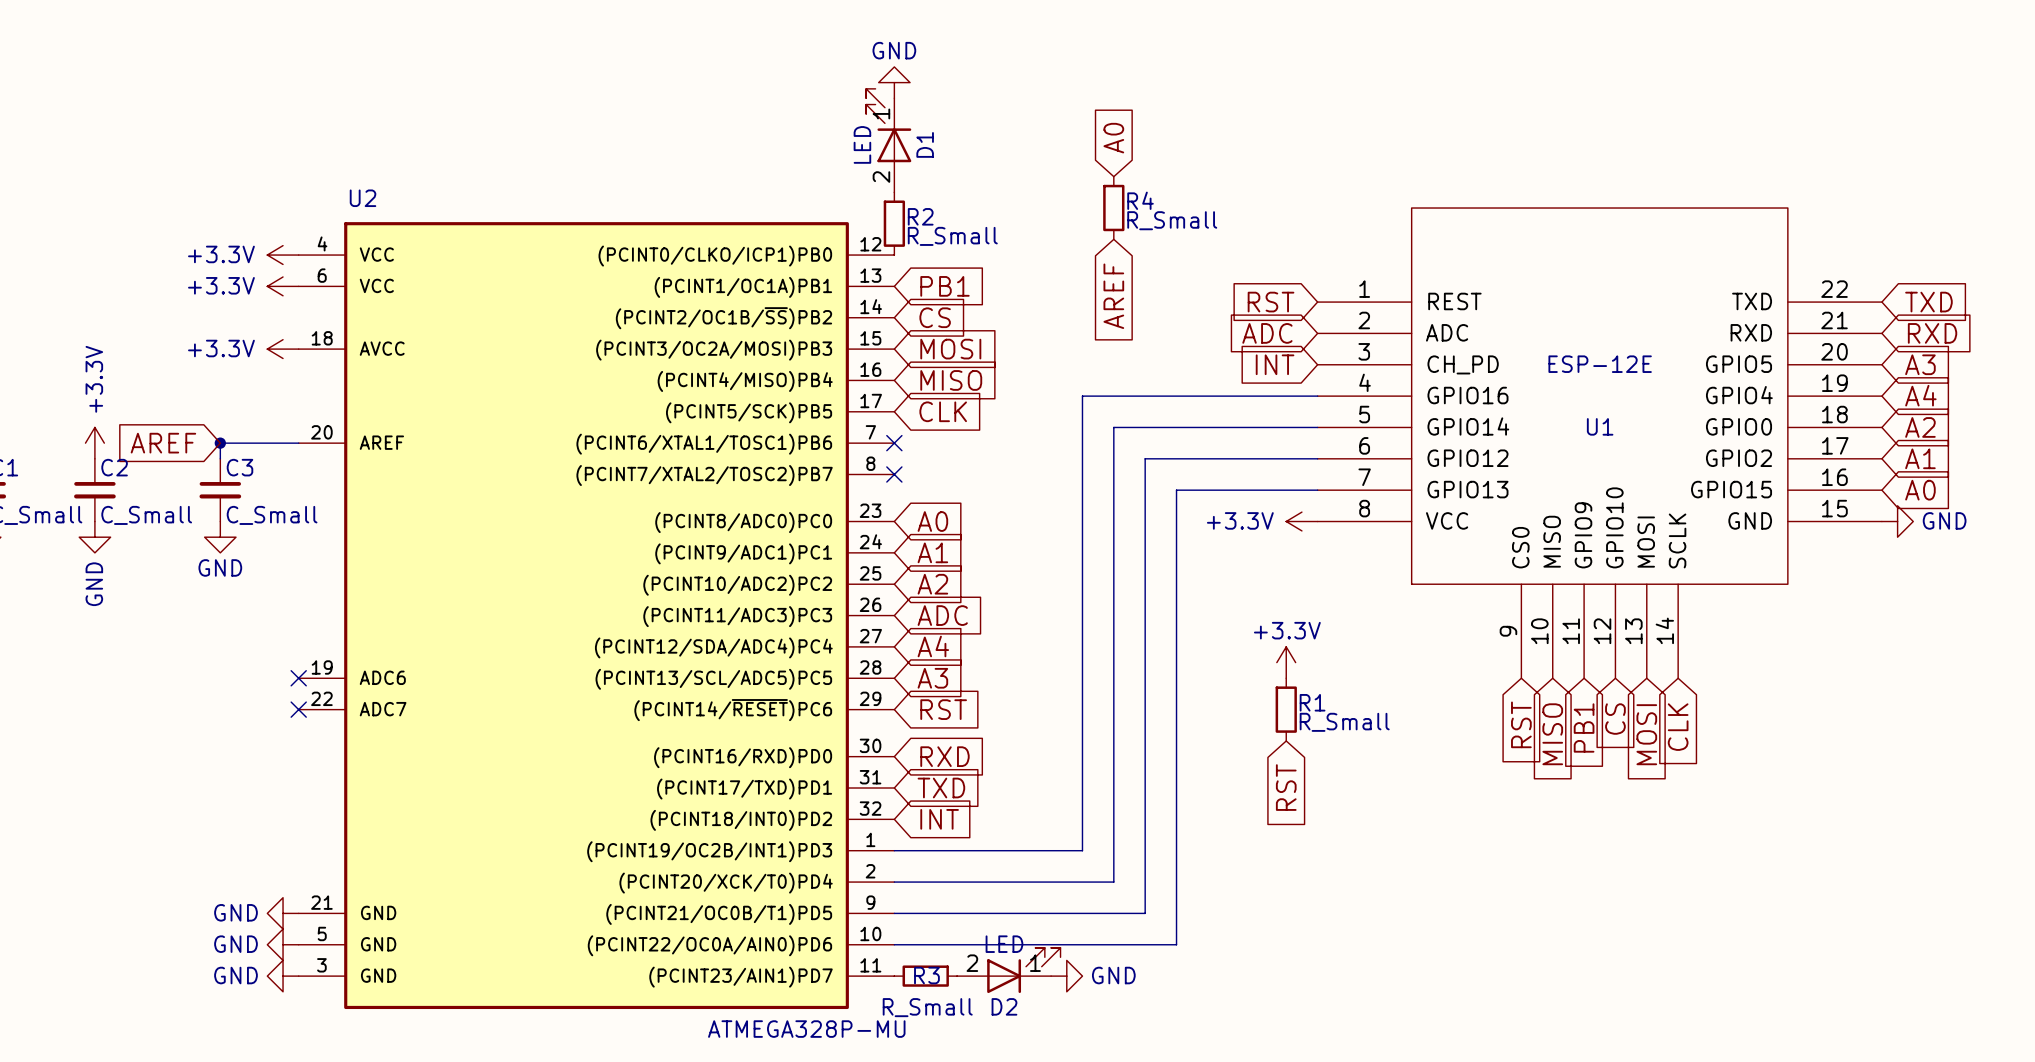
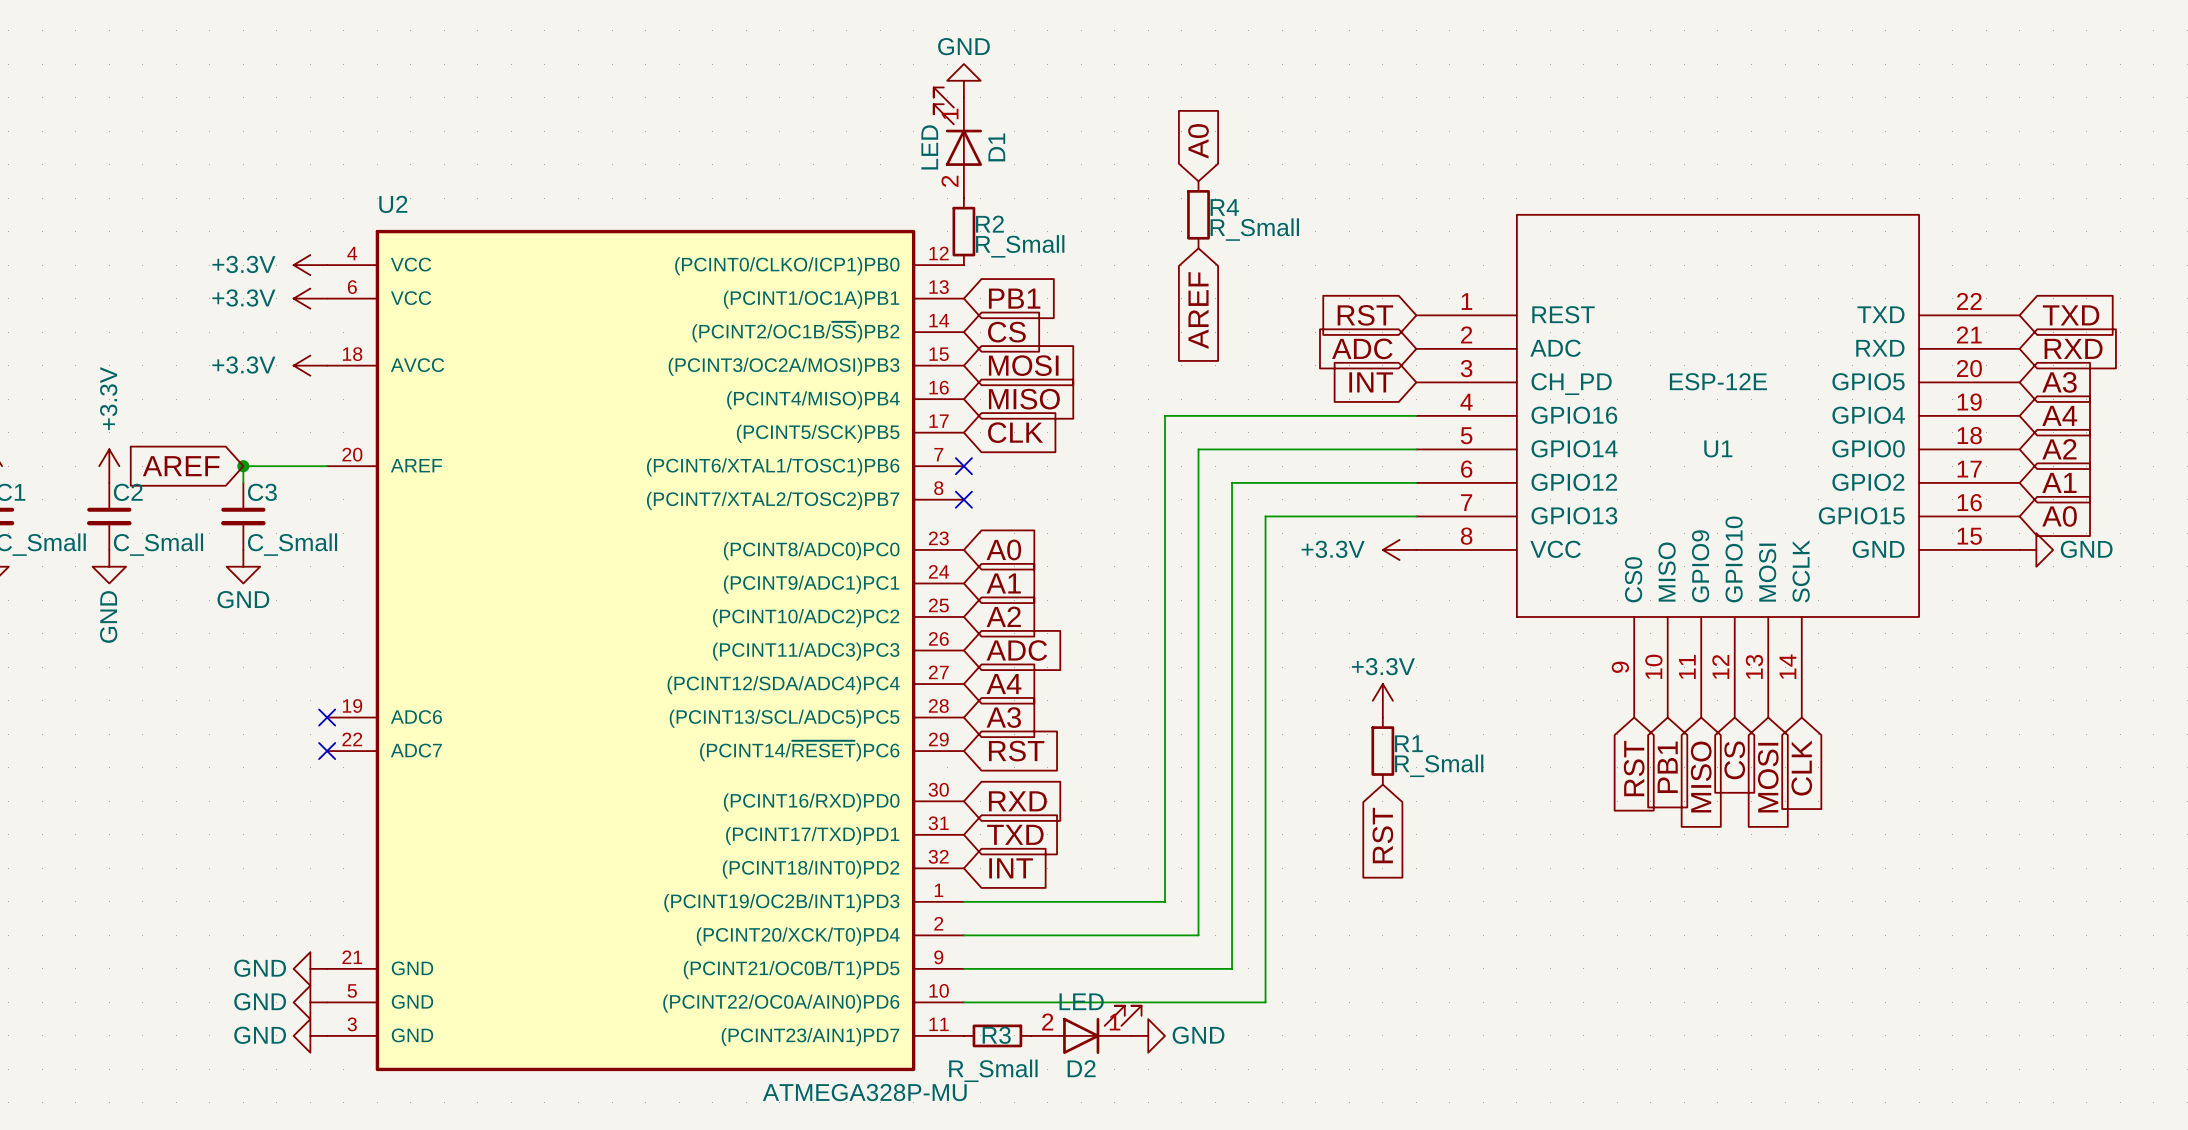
global label: PB1 (1584, 727) -> MISO (1701, 777)
global label: MISO (1552, 734) -> PB1 (1667, 767)

